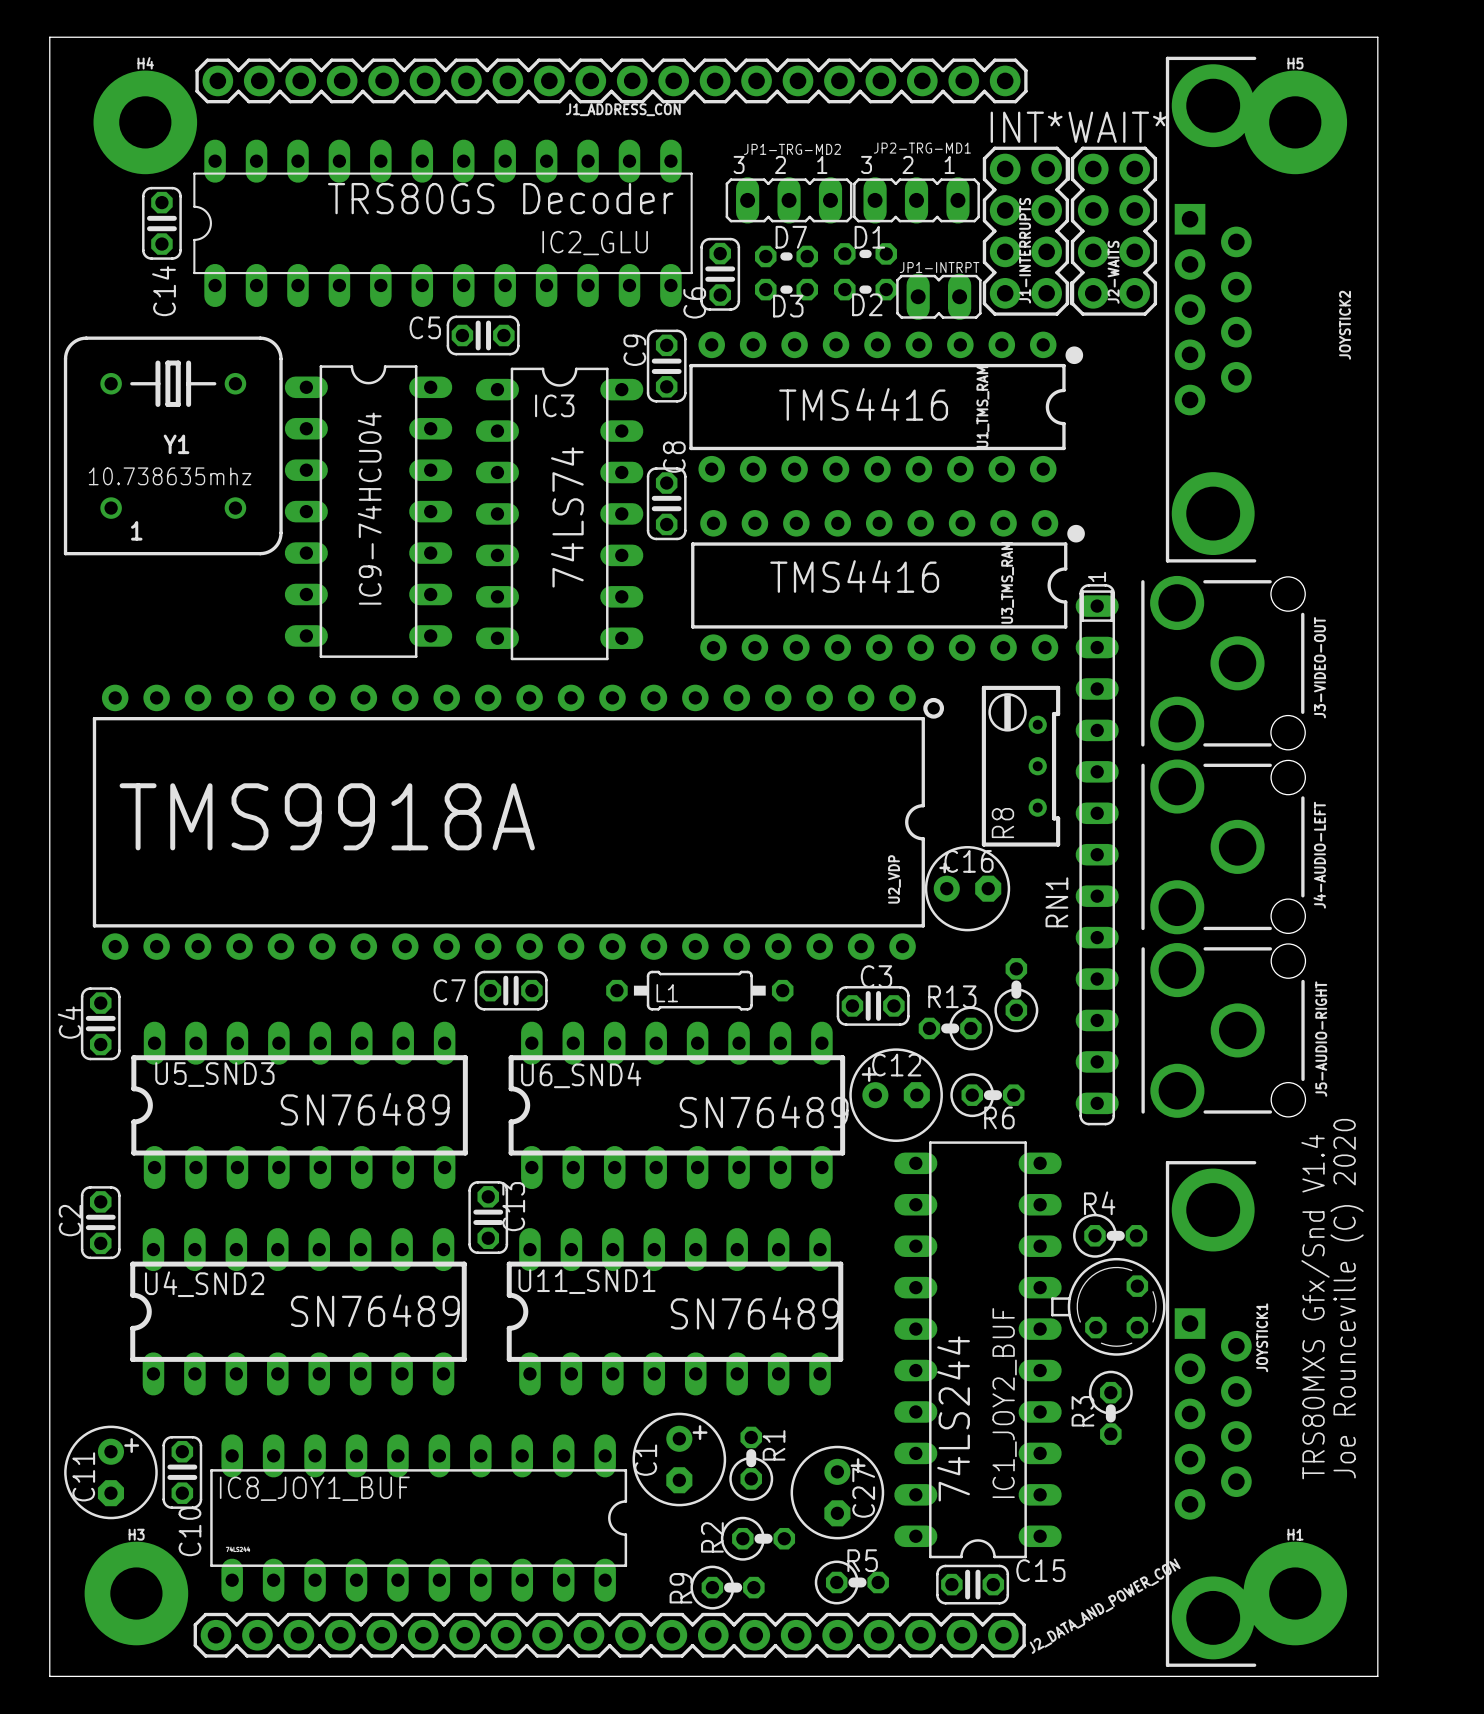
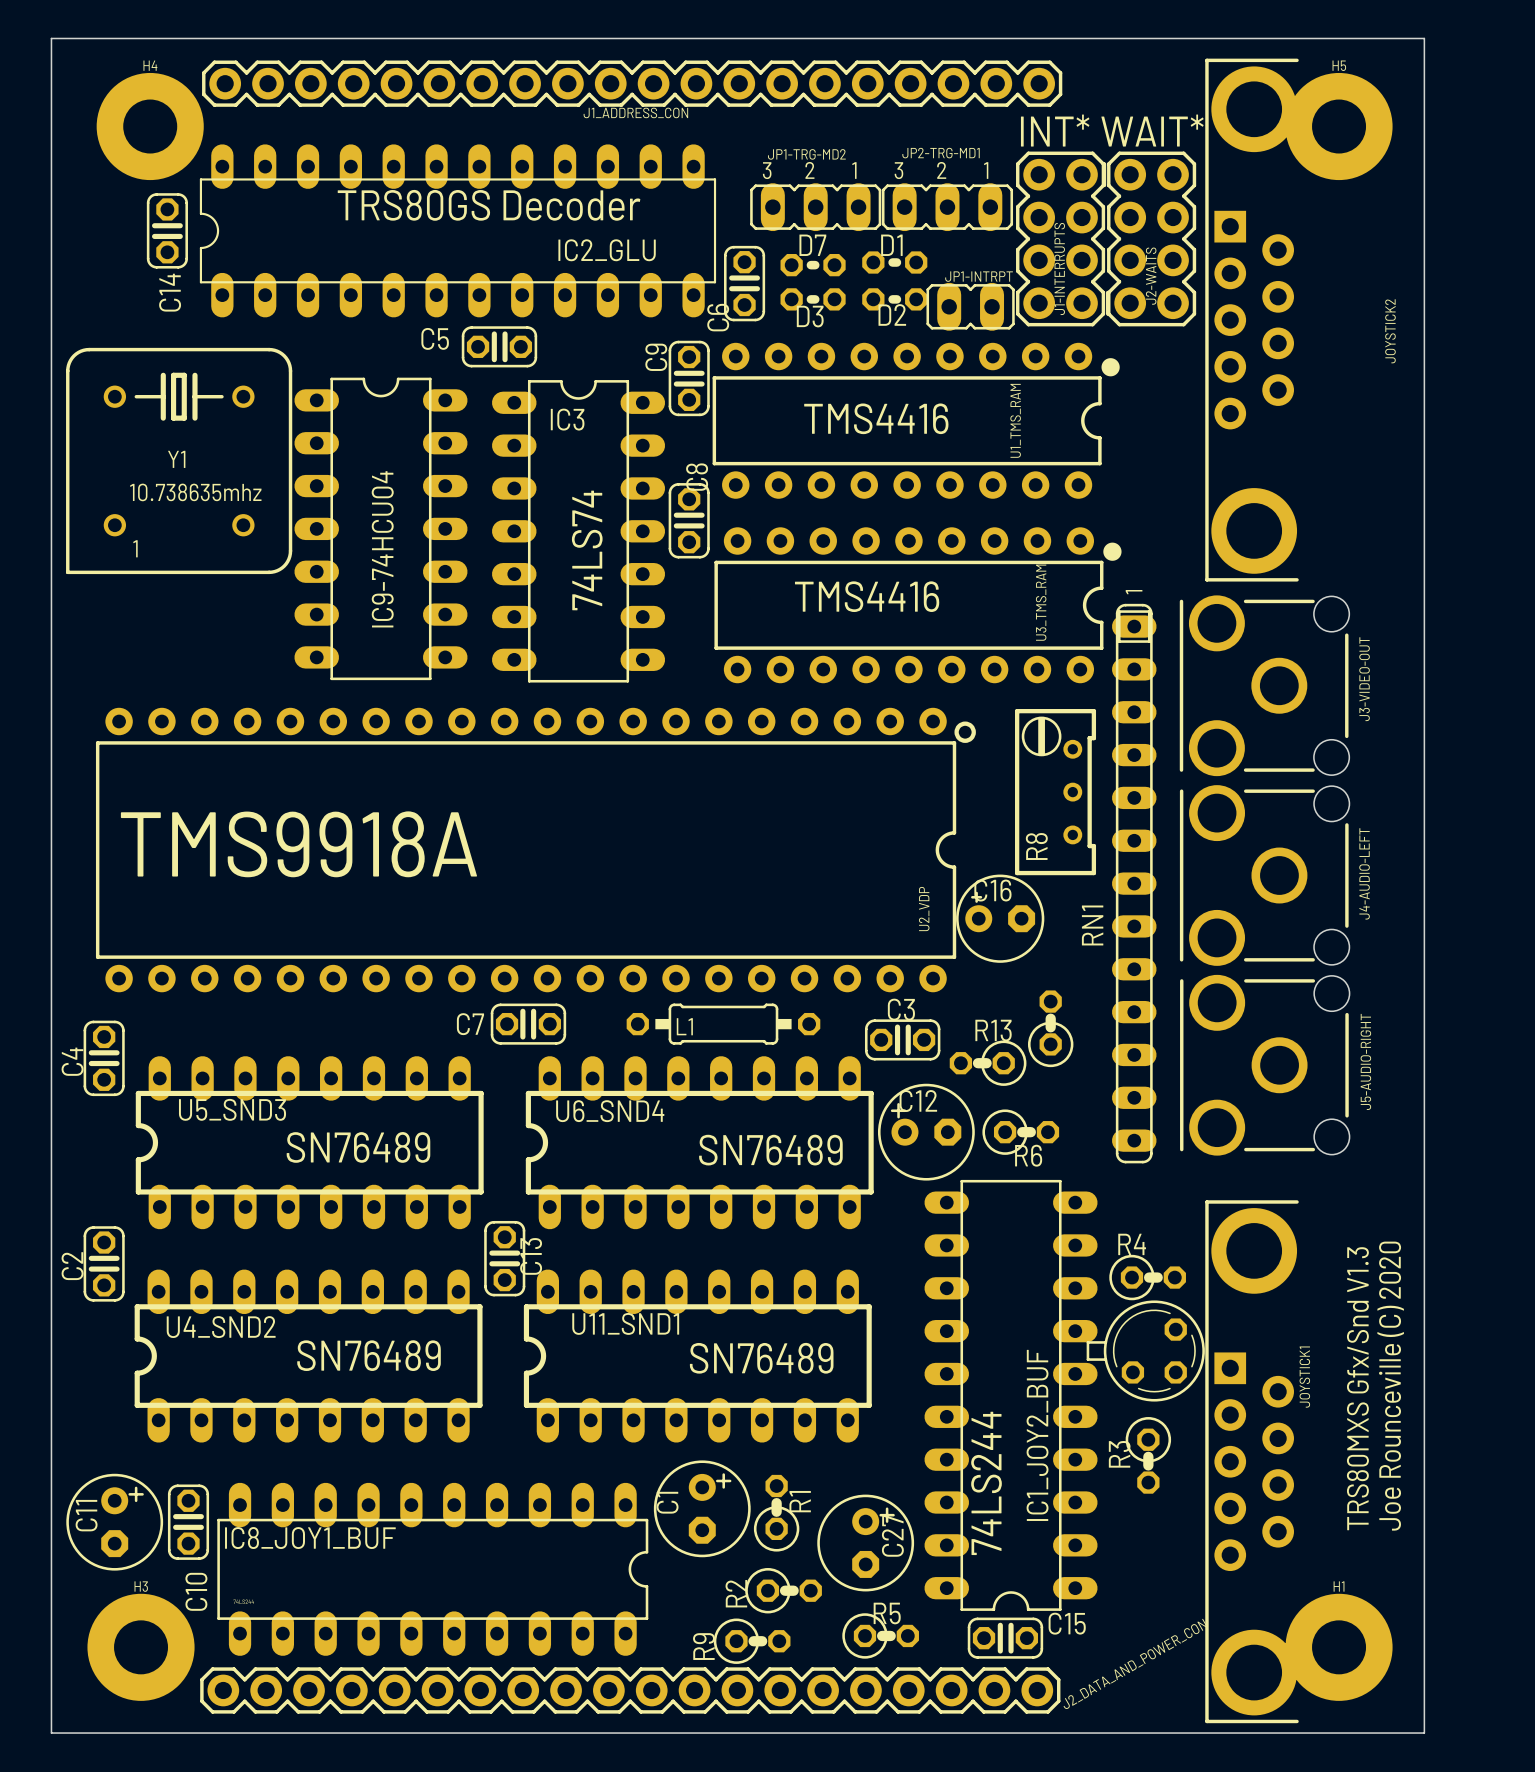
text: TRS80MXS Gfx/Snd V1.4 (1315, 1307) -> TRS80MXS Gfx/Snd V1.3 (1357, 1388)

